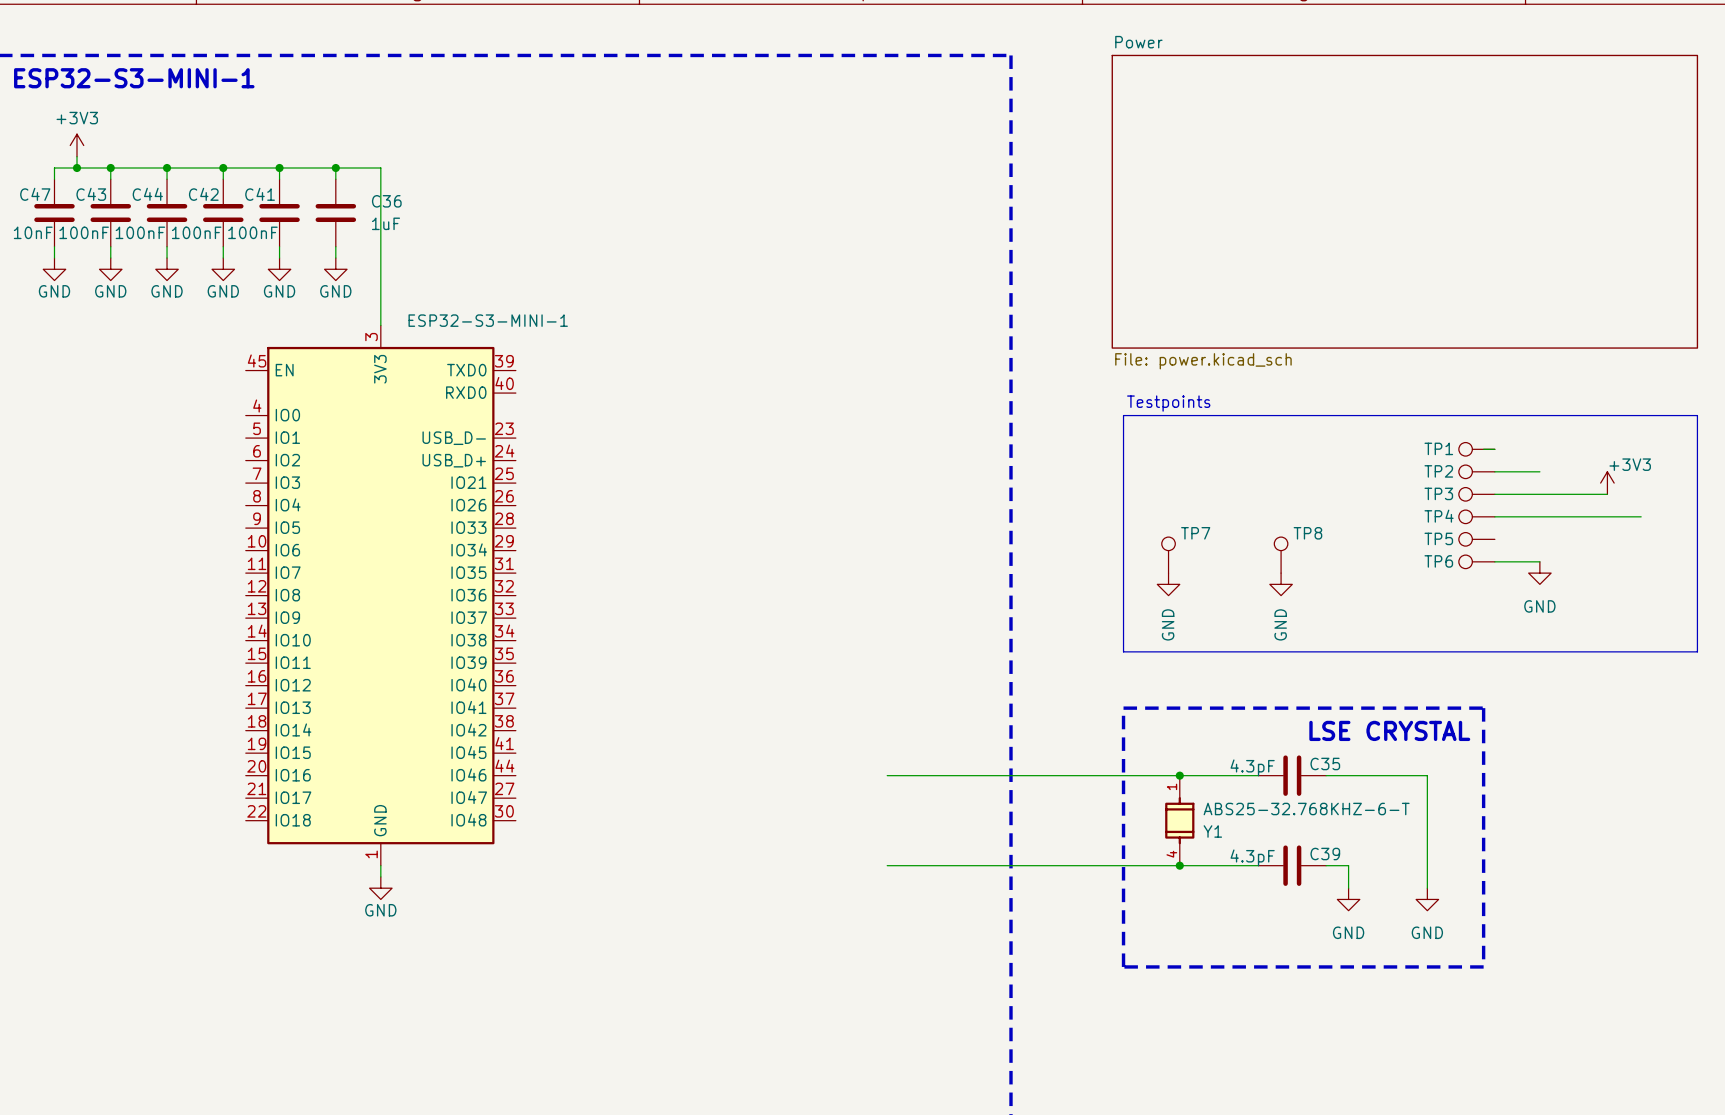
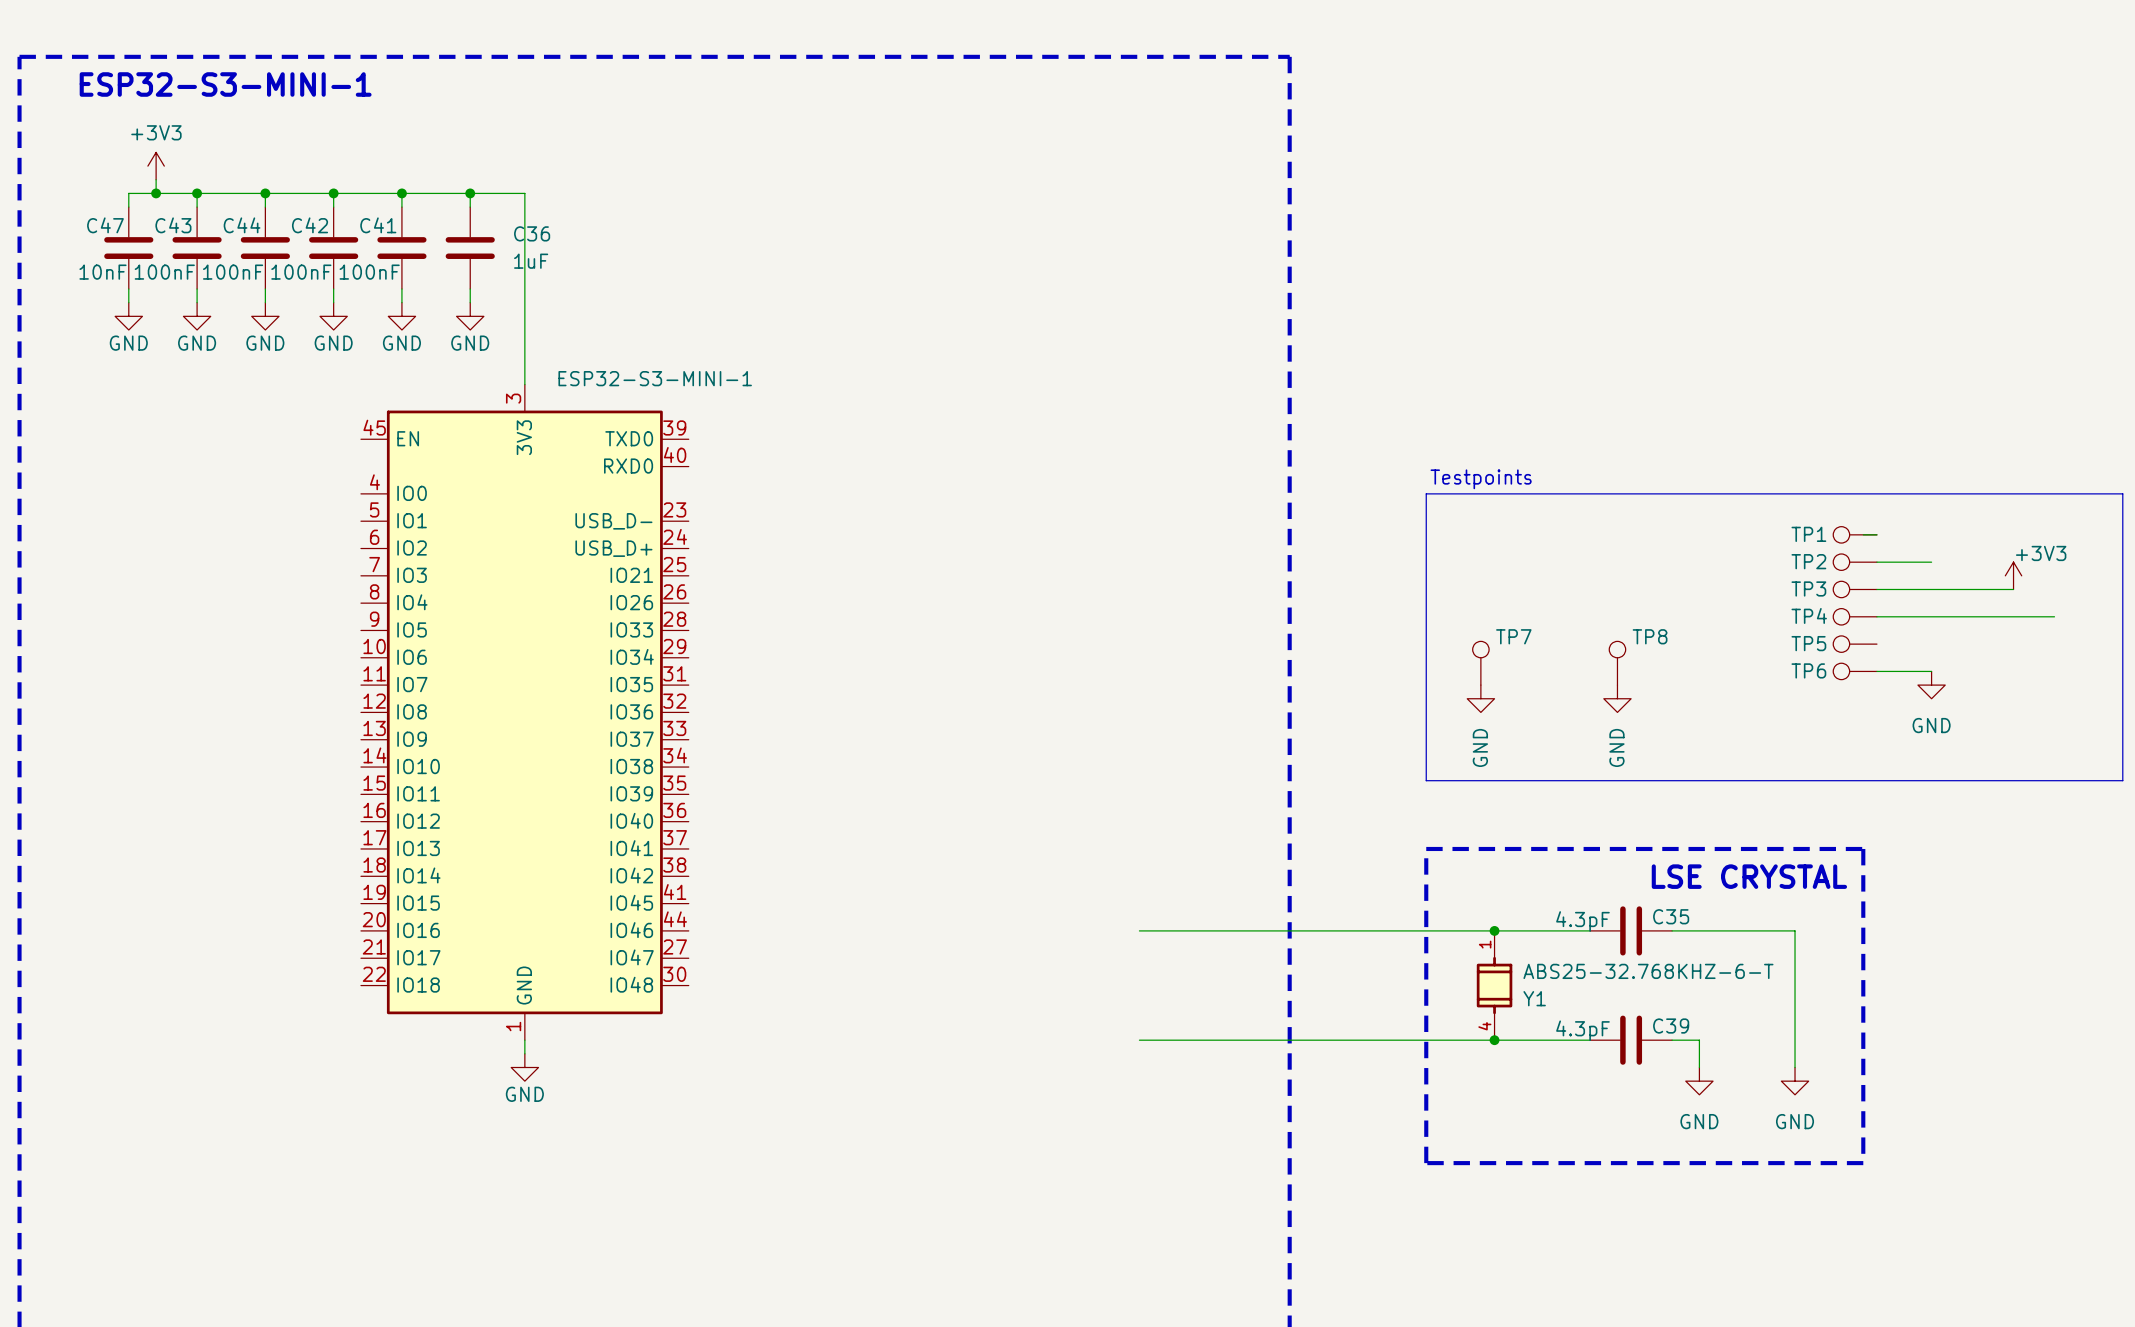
sheet Power: File: power.kicad_sch (1404, 201) -> none

